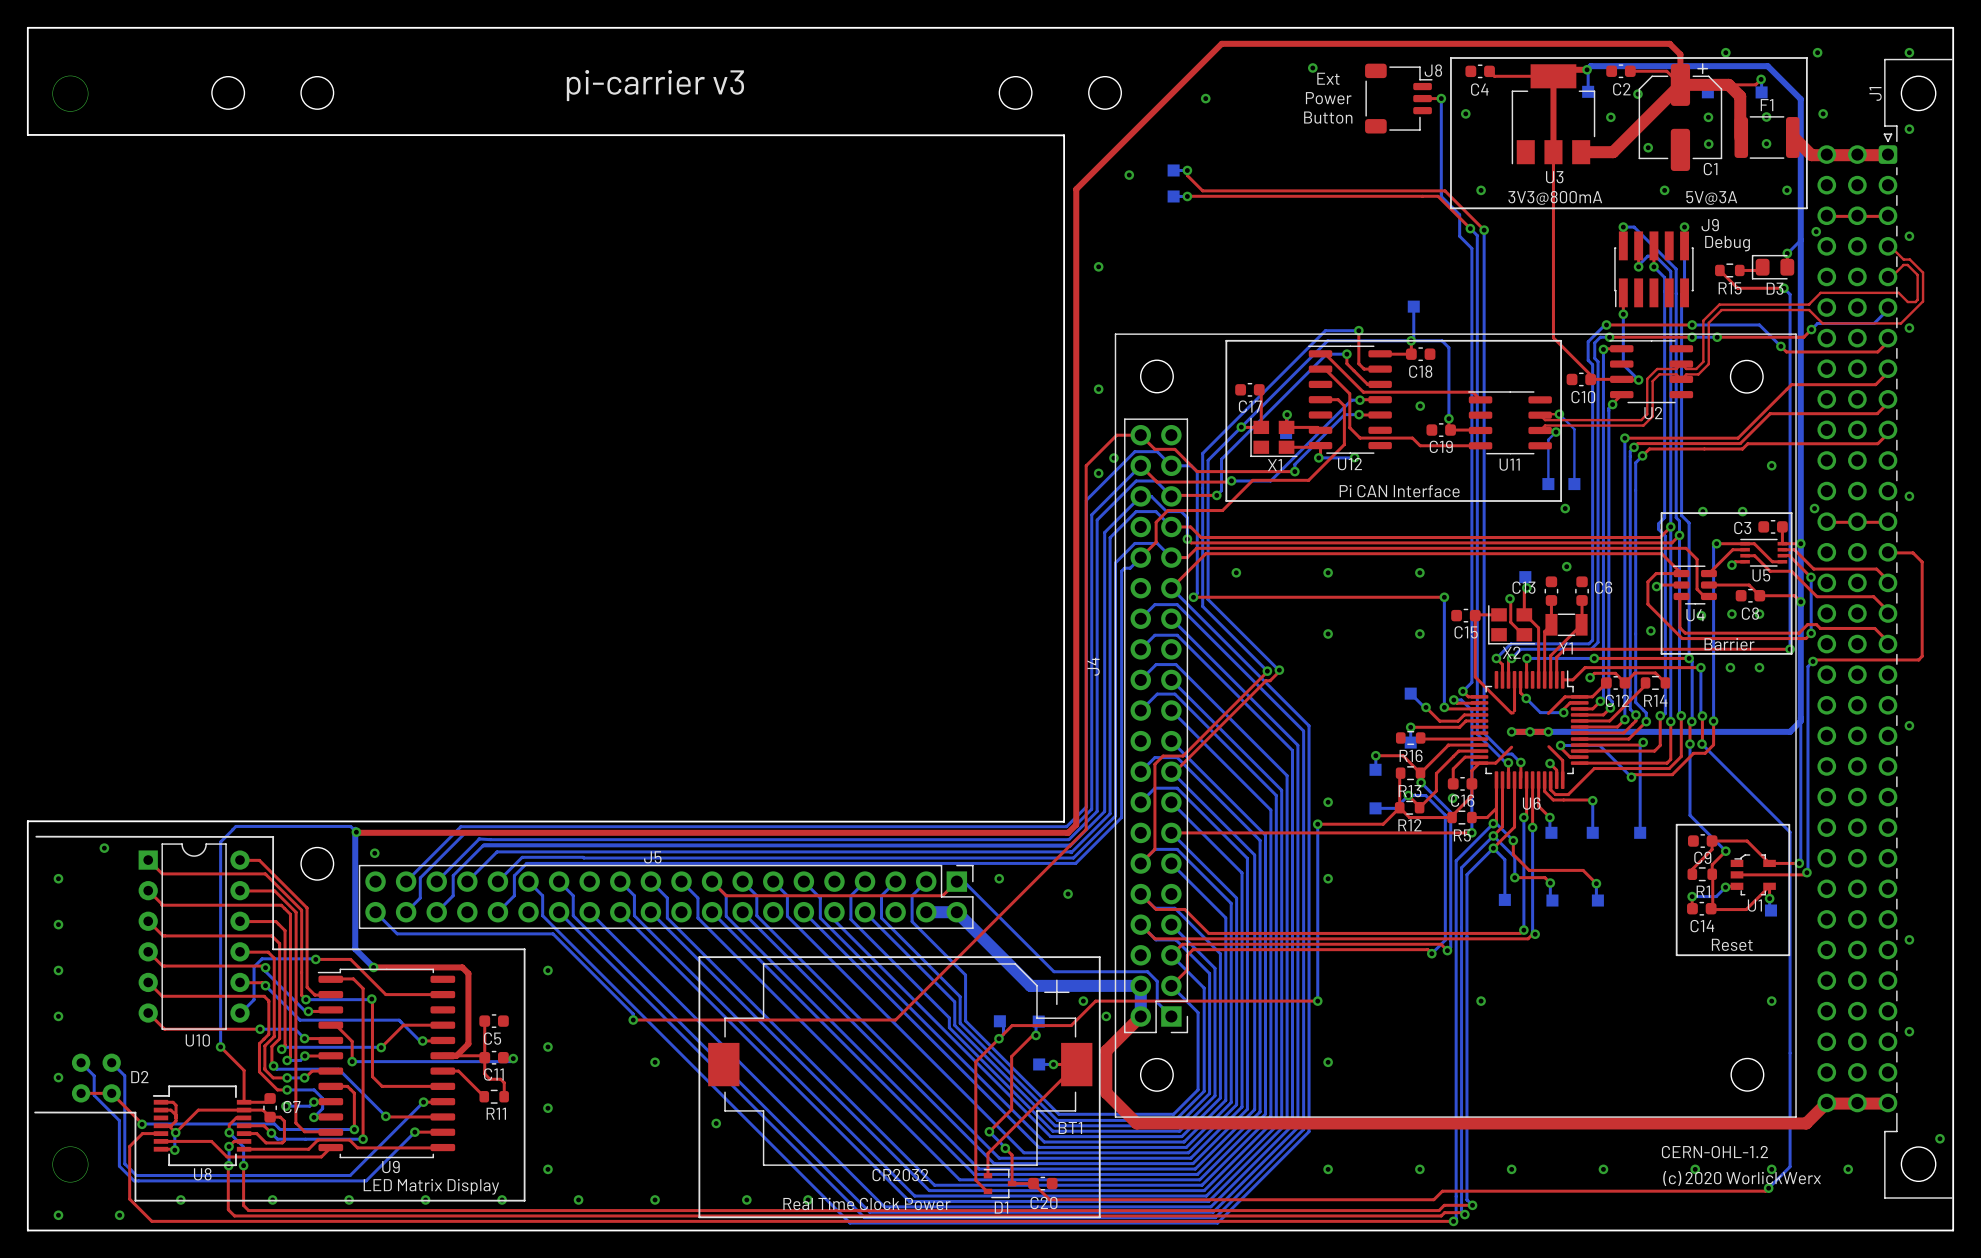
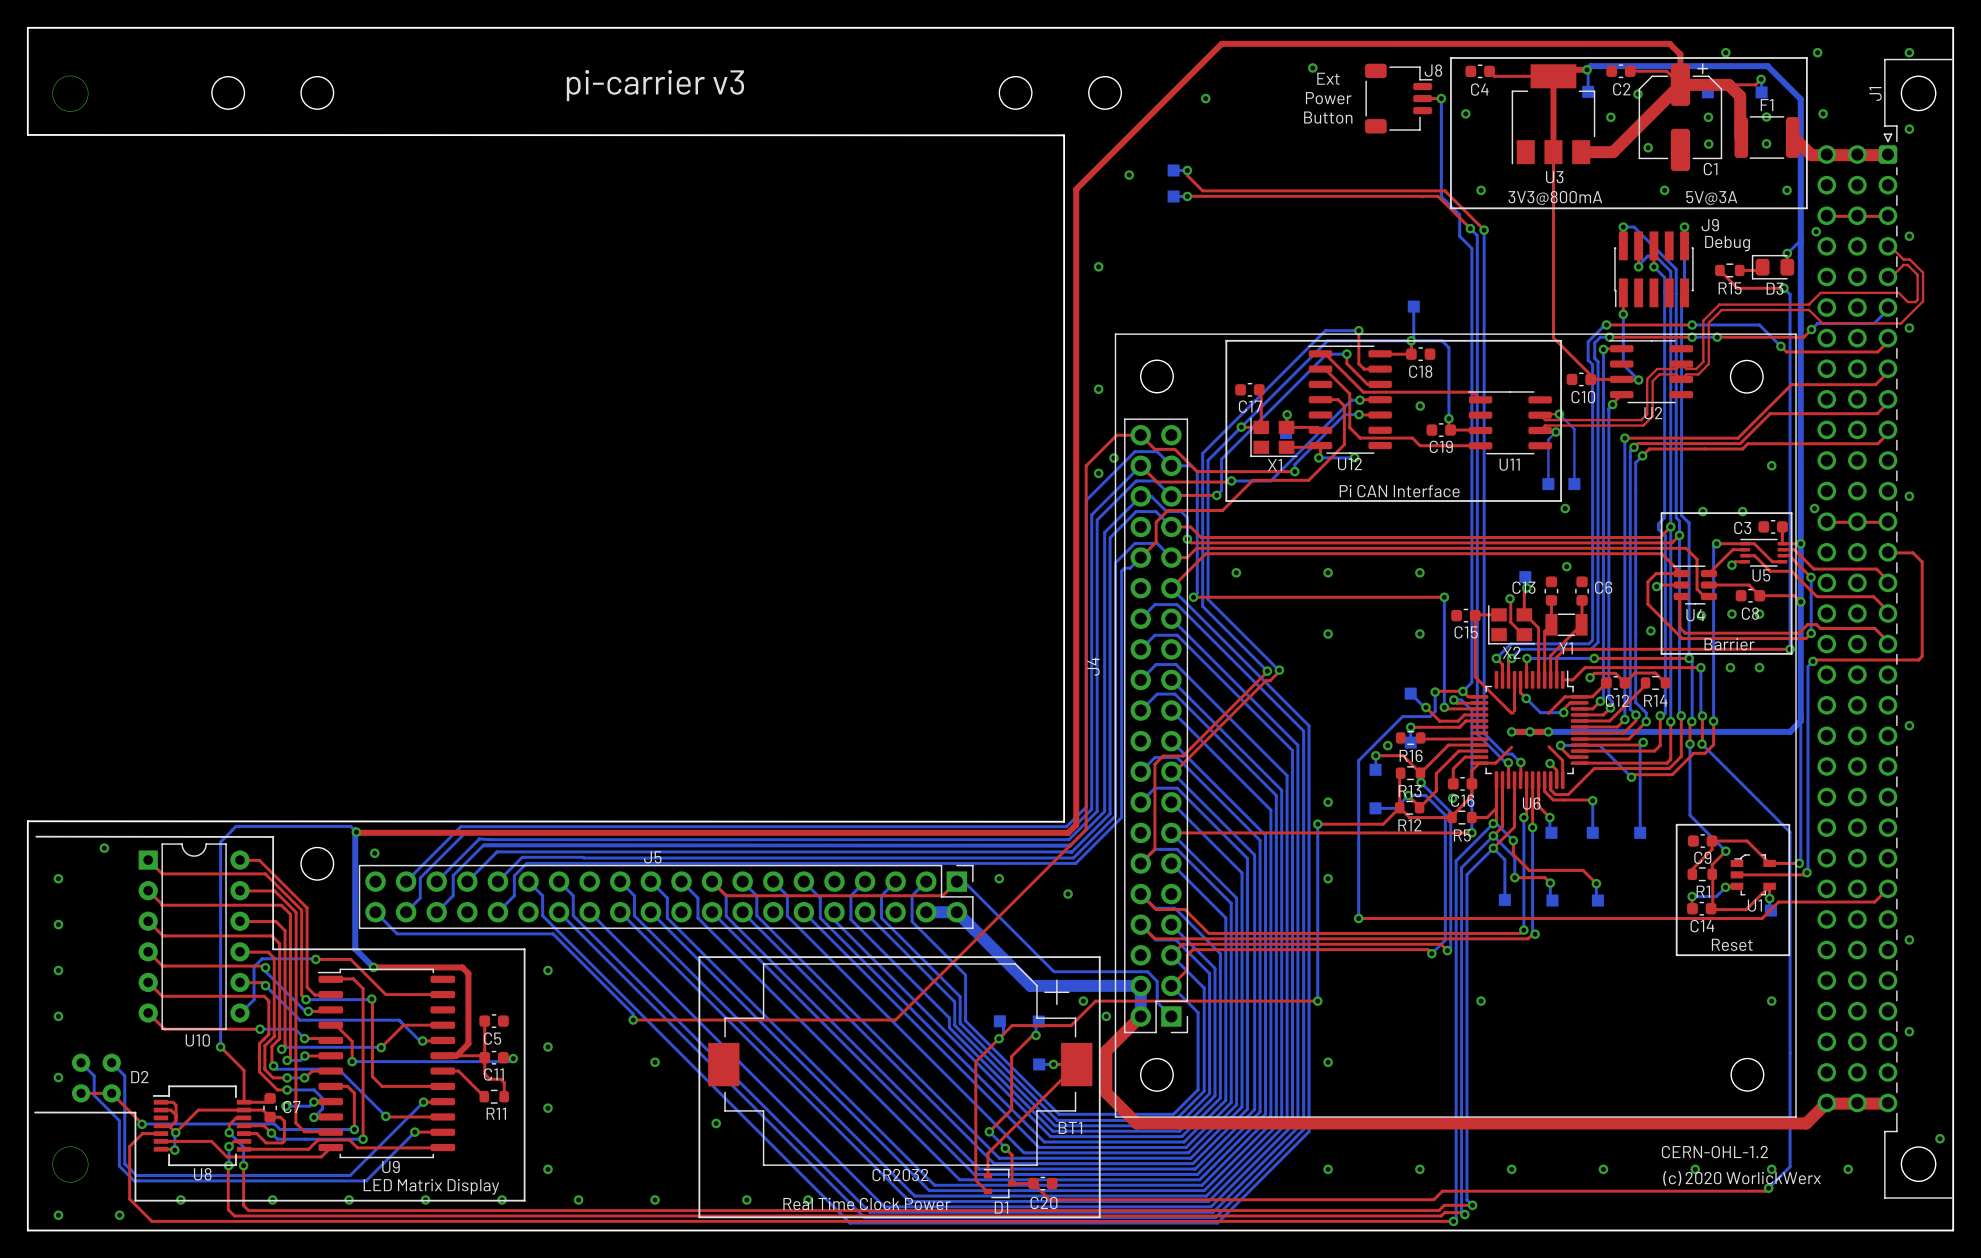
top track: none -> (1462, 691) (1435, 692)
bottom track: none -> (1435, 692) (1435, 711) (1430, 716) (1402, 716) (1358, 760) (1358, 918)
via: none -> (1435, 692)
via: none -> (1387, 745)
top track: none -> (1887, 888) (1874, 902) (1778, 902) (1762, 918) (1358, 918)
via: none -> (1358, 918)

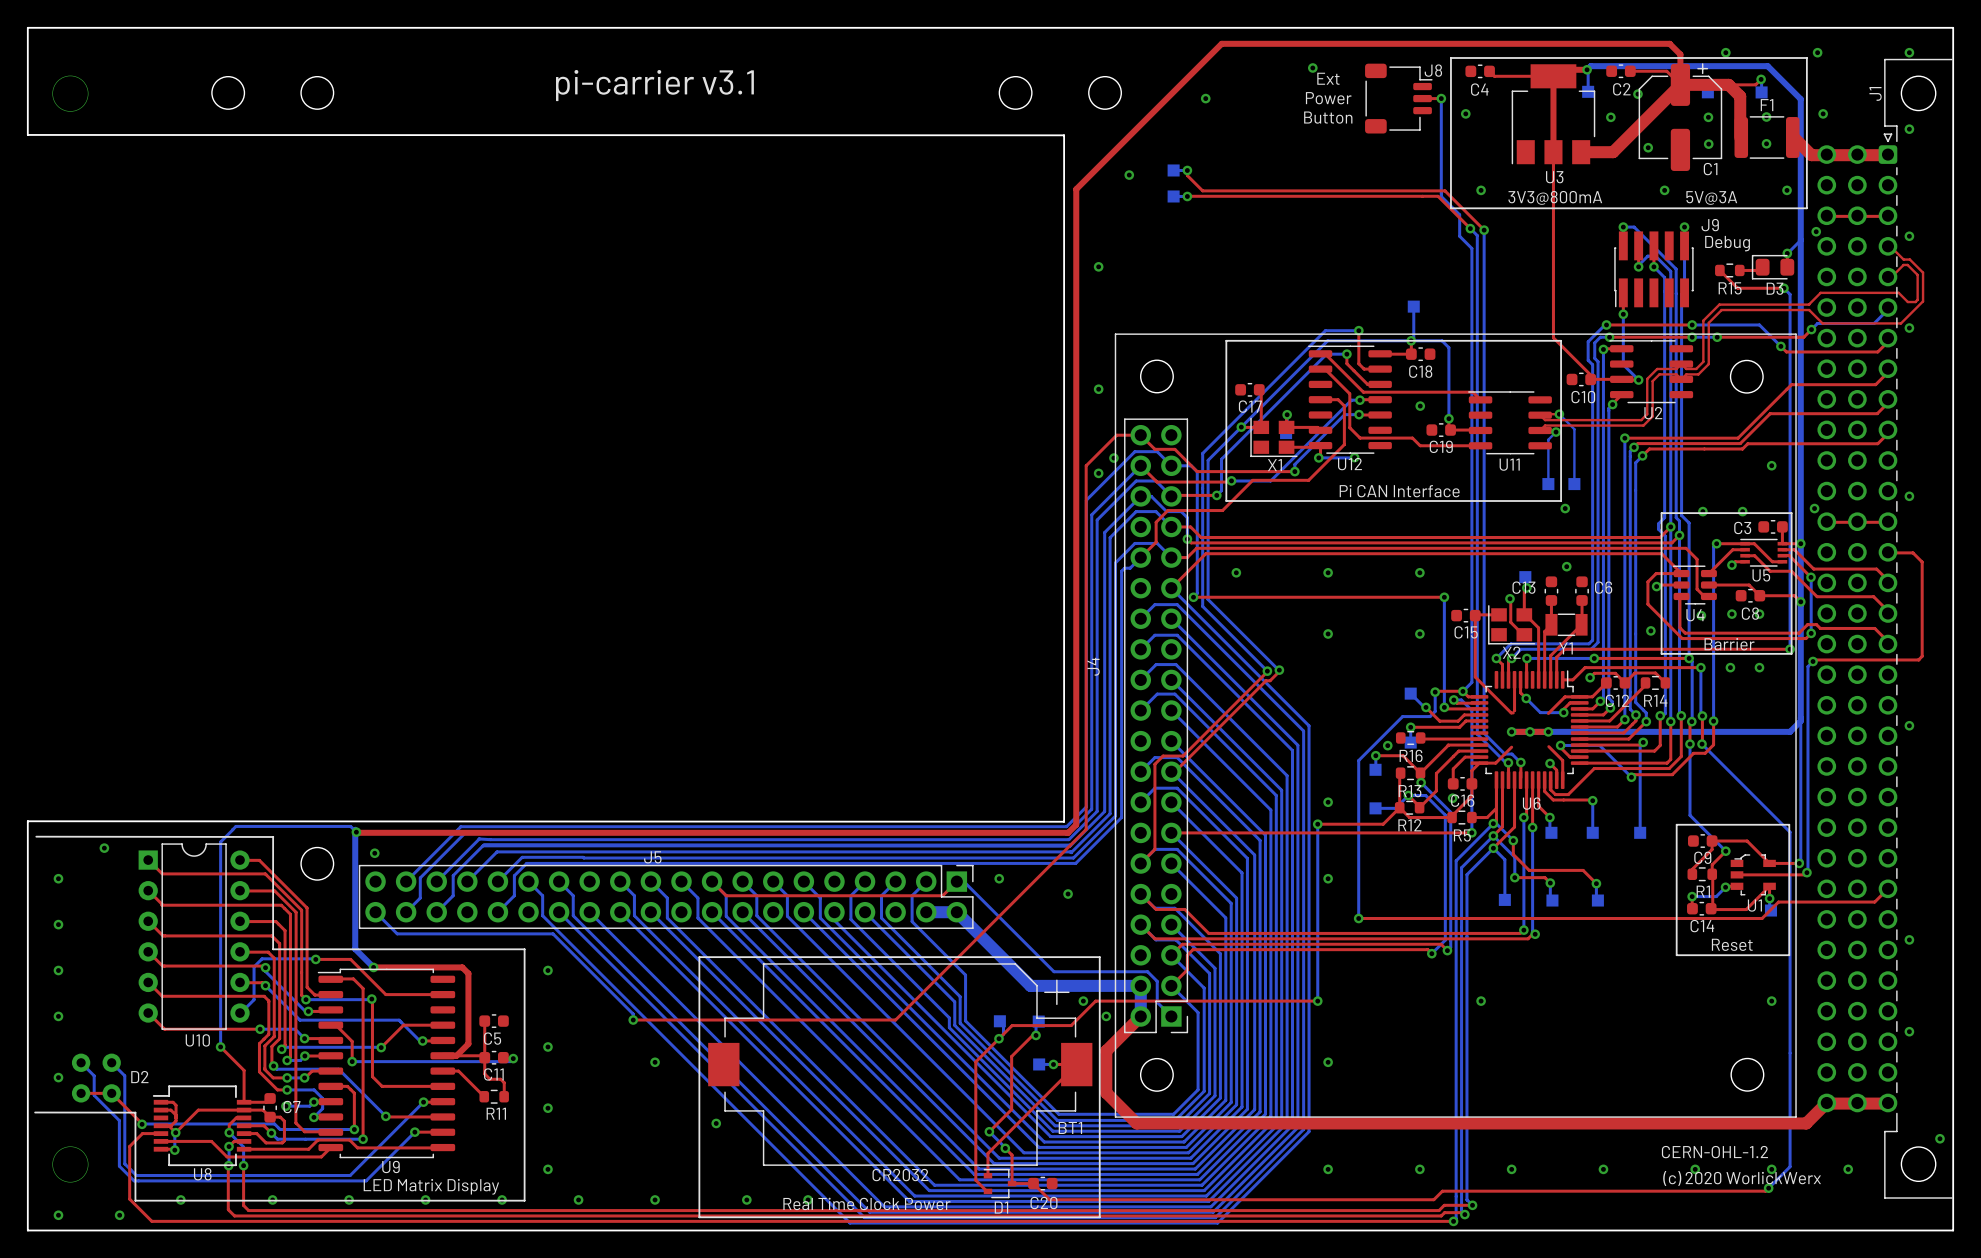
text: pi-carrier v3 (655, 85) -> pi-carrier v3.1 (654, 85)

